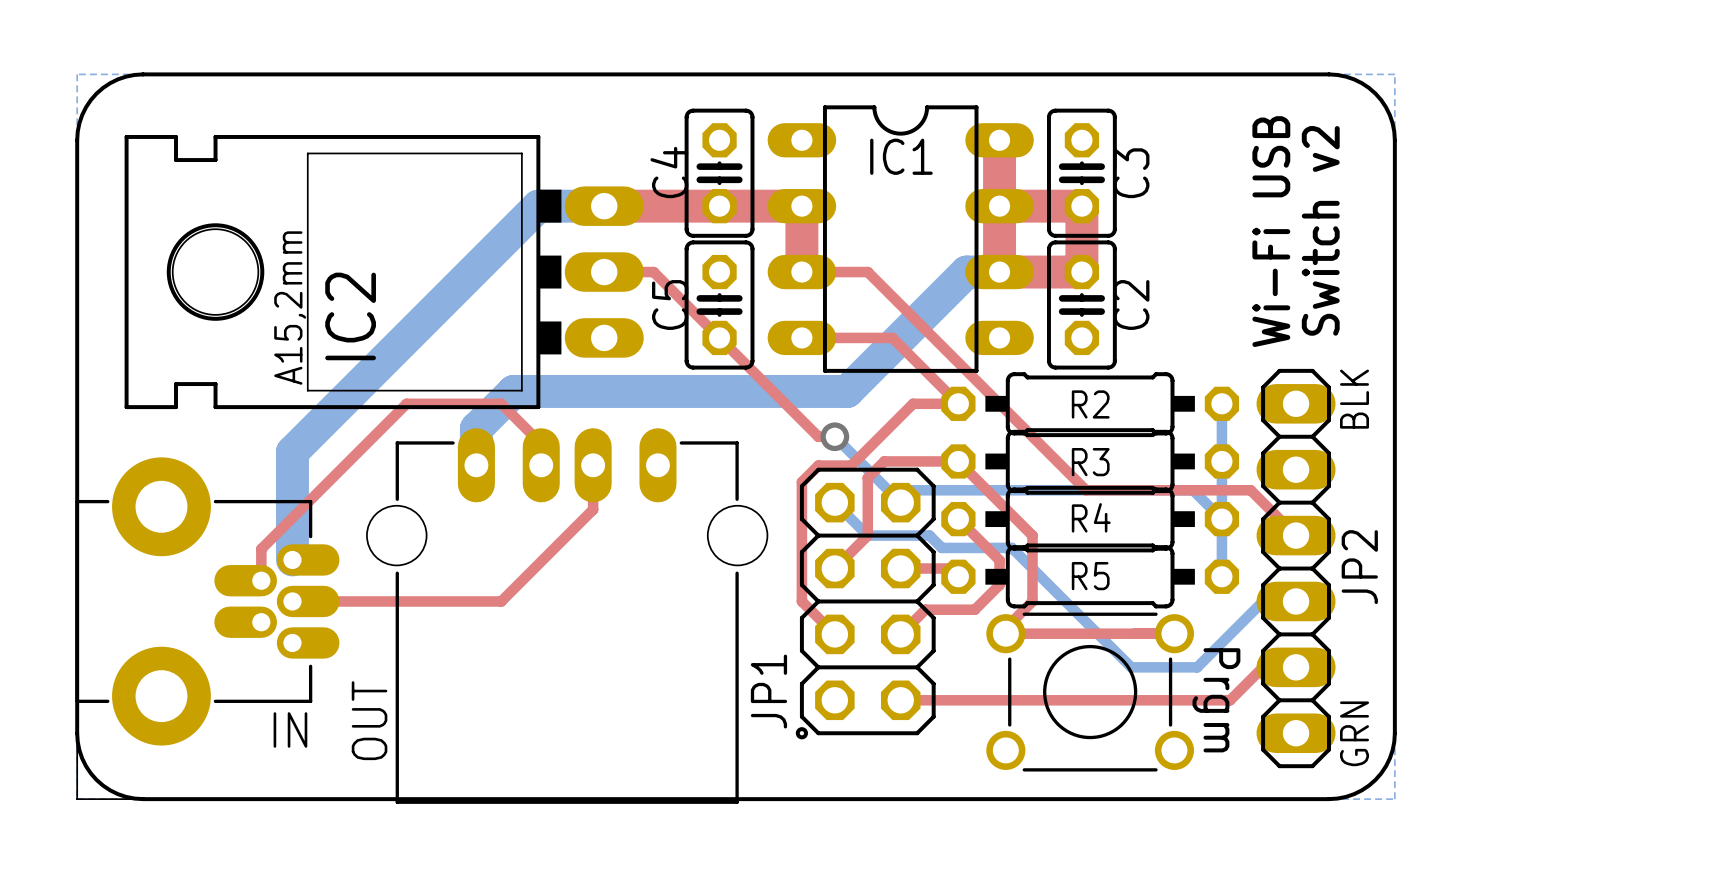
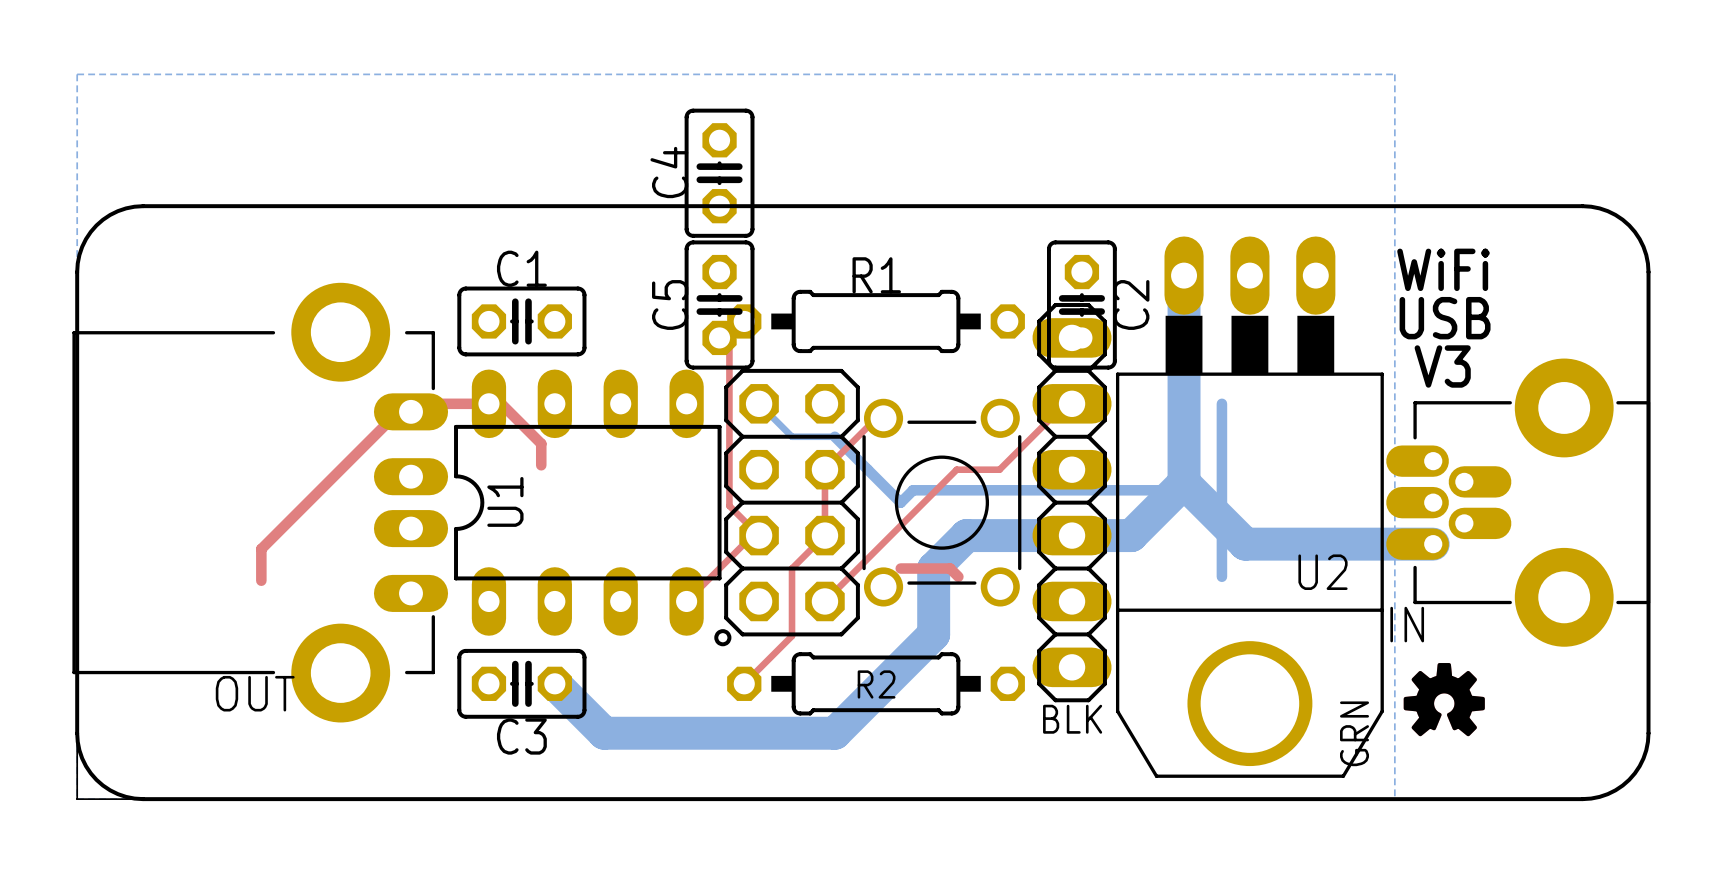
top track: (999, 140) (999, 272) (1081, 272) (1081, 206) (999, 206) -> none
C3 rotation: 0° (1081, 173) -> 90° clockwise (521, 683)
C3 position: (1081, 173) -> (521, 683)
top track: (604, 206) (801, 206) (801, 272) (867, 272) (1086, 490) (1250, 490) (1296, 535) -> none
bottom track: (604, 206) (538, 206) (292, 452) (292, 559) -> none
text: Switch v2 (1320, 230) -> none
text: Wi-Fi USB (1271, 231) -> none
IC1: (900, 239) -> none
text: none -> WiFi (1443, 269)
board edge: (77, 272) (77, 140) (79, 123) (86, 107) (96, 93) (117, 79) (134, 74) (1328, 74) (1354, 79) (1369, 88) (1381, 100) (1392, 123) (1394, 140) (1394, 733) (1389, 758) (1375, 779) (1354, 794) (1328, 799) -> (77, 272) (82, 246) (96, 225) (117, 211) (143, 206) (1582, 206) (1607, 211) (1622, 219) (1634, 231) (1646, 254) (1648, 272) (1648, 733) (1643, 758) (1634, 773) (1622, 785) (1607, 794) (1591, 798) (1328, 799)
IC2: (384, 272) -> none
top track: (604, 272) (653, 272) (818, 436) (834, 436) -> none
bottom track: (999, 272) (966, 272) (847, 391) (513, 391) (476, 428) (476, 465) -> none
bottom track: none -> (1184, 275) (1184, 482)
text: none -> USB (1445, 318)
C1: none -> (521, 321)
top track: none -> (744, 321) (729, 336) (729, 505) (759, 535) (752, 535) (686, 601)
R1: none -> (876, 321)
top track: (801, 337) (892, 337) (958, 403) (913, 403) (851, 465) (818, 465) (801, 482) (801, 601) (834, 634) -> none
text: none -> V3 (1442, 366)
text rotation: 0° (1354, 399) -> 90° clockwise (1072, 719)
text position: BLK (1354, 399) -> BLK (1072, 719)
bottom track: none -> (759, 403) (792, 436) (834, 436)
top track: none -> (1072, 403) (1065, 403) (999, 469) (956, 469) (824, 601)
R2 position: (1090, 403) -> (876, 683)
top track: none -> (883, 418) (876, 418) (824, 469) (824, 535) (792, 568) (792, 636) (744, 683)
via: (834, 436) -> none
R3: (1090, 461) -> none
top track: (593, 465) (593, 509) (501, 601) (292, 601) -> none
bottom track: none -> (1184, 482) (1131, 535) (966, 535) (933, 568) (933, 634) (834, 733) (604, 733) (554, 683)
bottom track: none -> (1184, 482) (1245, 544) (1433, 544)
OUT: none -> (260, 502)
U1: none -> (587, 502)
part: none -> (792, 502)
bottom track: (834, 502) (867, 535) (929, 535) (941, 547) (1011, 547) (1131, 667) (1197, 667) (1263, 601) (1296, 601) -> none
part: none -> (1072, 502)
IN: none -> (1518, 502)
U2: none -> (1249, 507)
top track: (958, 519) (999, 560) (999, 585) (974, 609) (925, 609) (900, 634) -> none
R4: (1090, 519) -> none
top track: (834, 568) (867, 535) (867, 477) (884, 461) (958, 461) (1032, 535) (1032, 601) (1005, 628) (1005, 633) (1174, 633) -> none
JP2: (1296, 568) -> none
R5: (1090, 576) -> none
IN: (207, 601) -> none
JP1: (867, 601) -> none
OUT: (567, 616) -> none
drawing: none -> [714, 629, 732, 647]
drawing: none -> [1403, 663, 1485, 737]
top track: (1296, 667) (1263, 667) (1230, 700) (900, 700) -> none
part rotation: 0° (1090, 692) -> 90° clockwise (941, 502)
part position: (1090, 692) -> (941, 502)
text: Prgm (1216, 700) -> none
drawing: [795, 727, 809, 740] -> none

